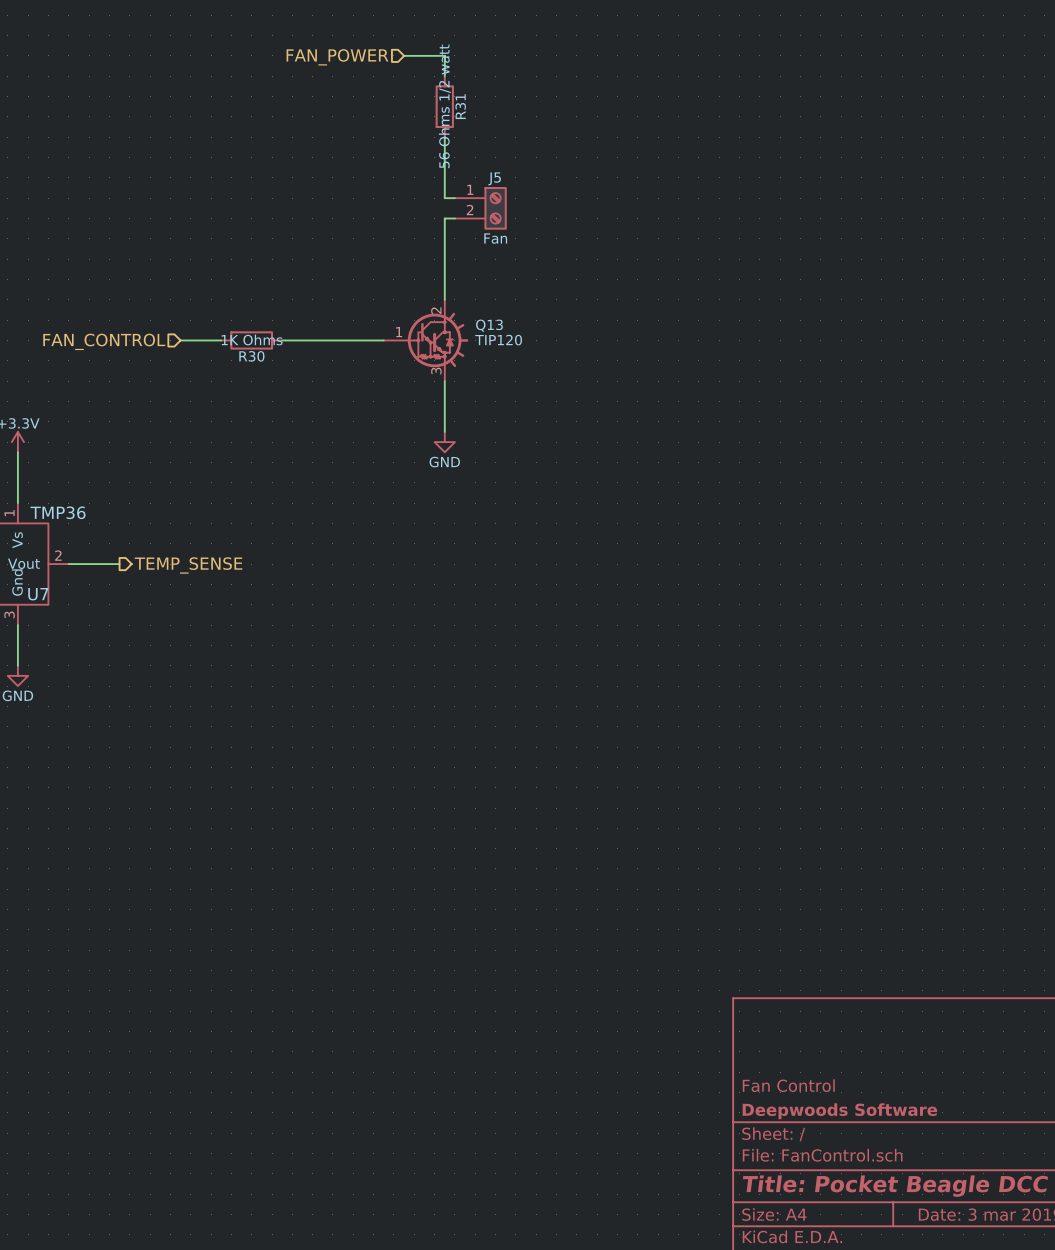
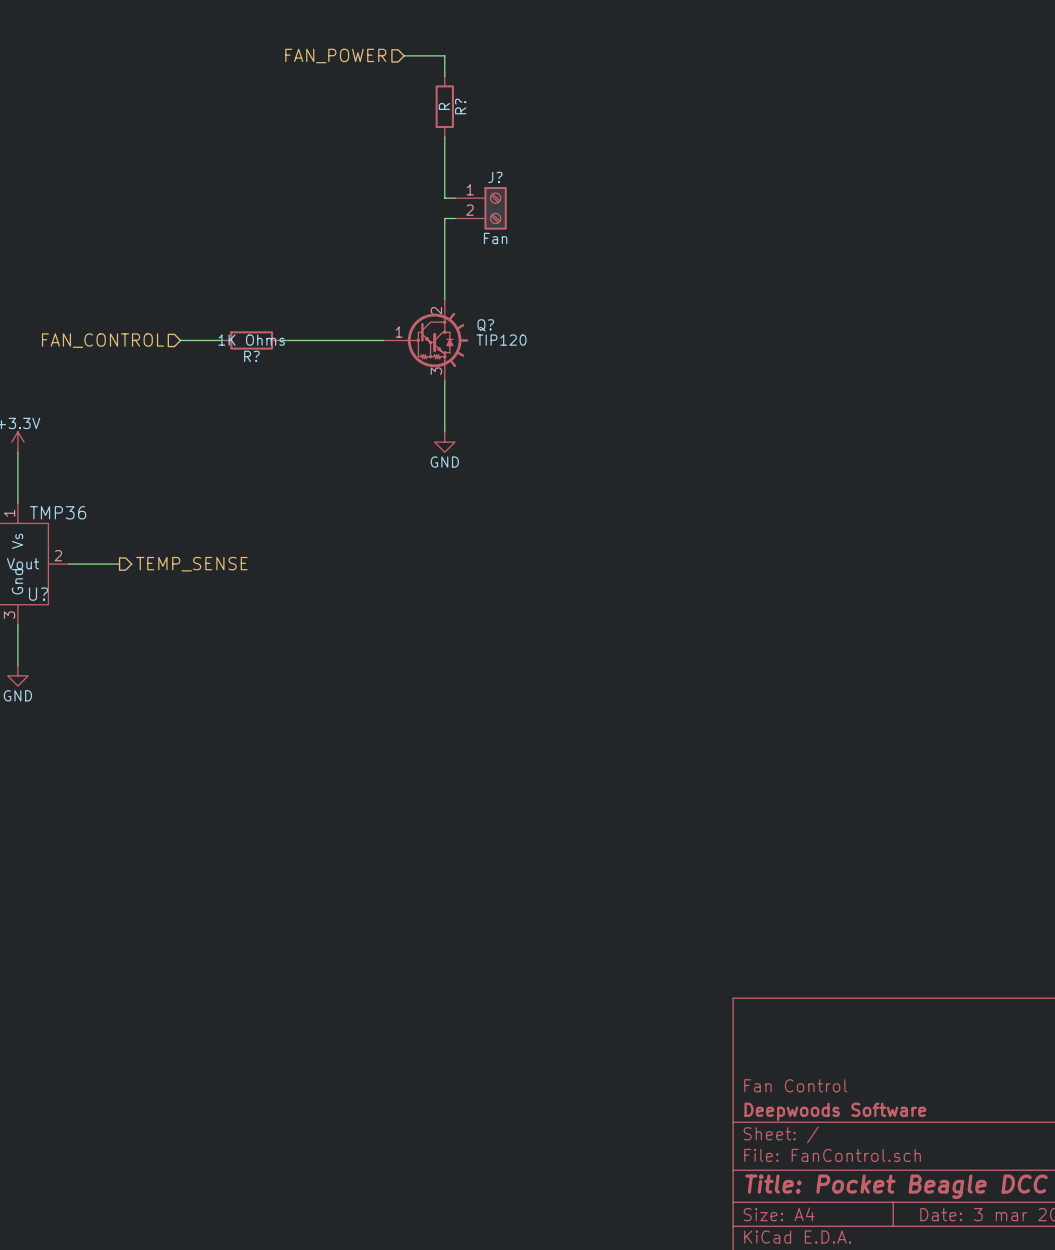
R31 value: 56 Ohms 1/2 watt (444, 106) -> R (444, 106)
R31 name: R31 (460, 106) -> R? (460, 106)
J5 name: J5 (494, 178) -> J? (495, 177)
Q13 name: Q13 (489, 325) -> Q? (485, 325)
R30 name: R30 (251, 356) -> R? (251, 356)
U7 name: U7 (38, 594) -> U? (38, 594)

